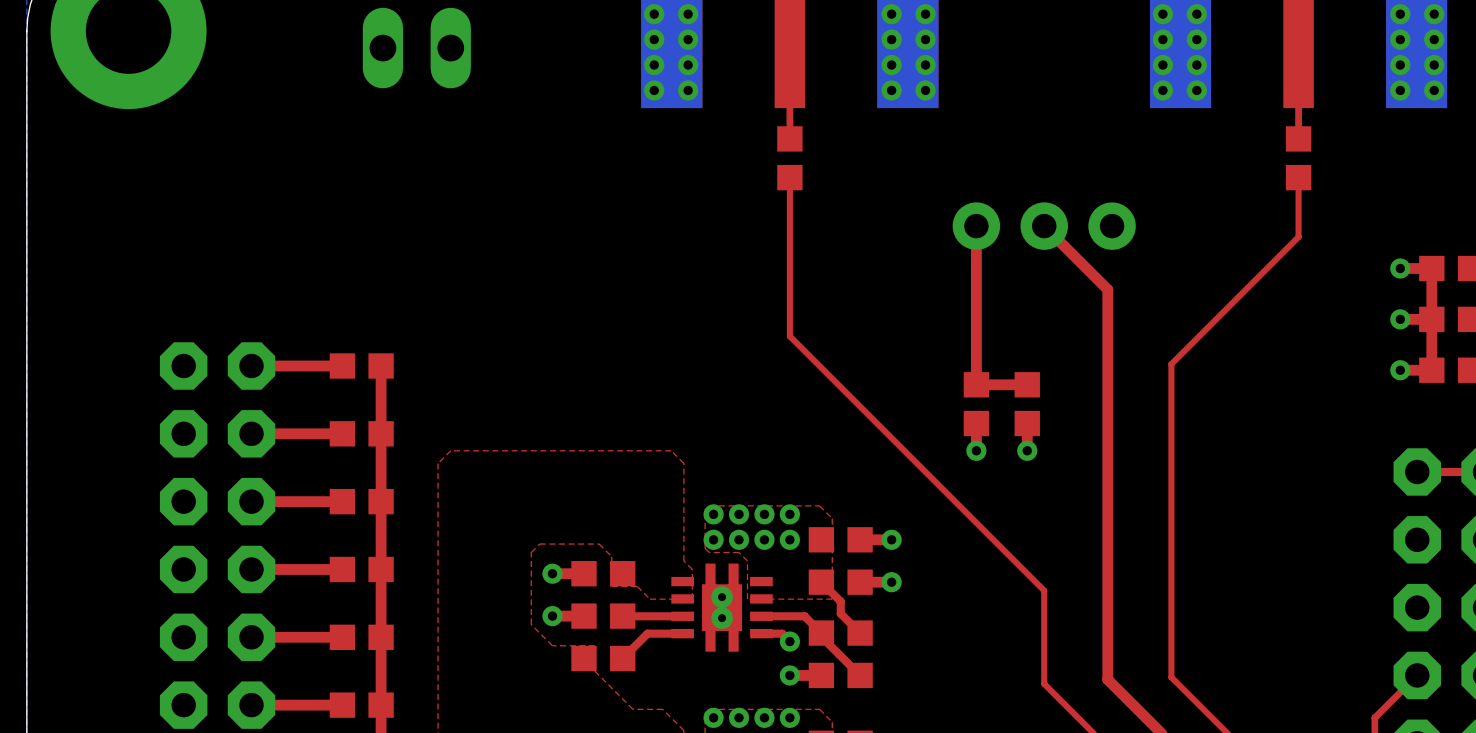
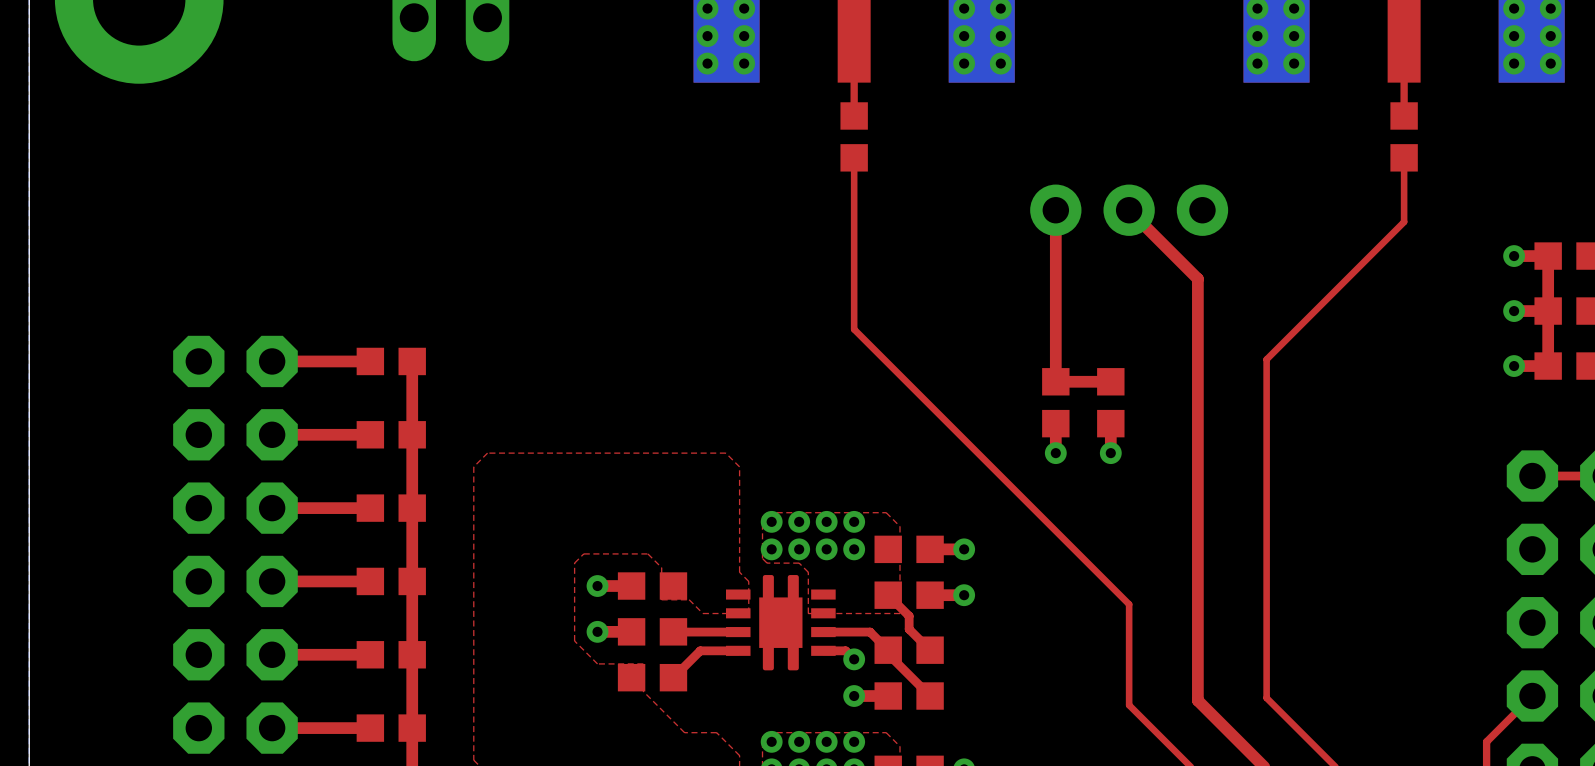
part footprint: [671, 563, 773, 652] -> [725, 575, 836, 671]

